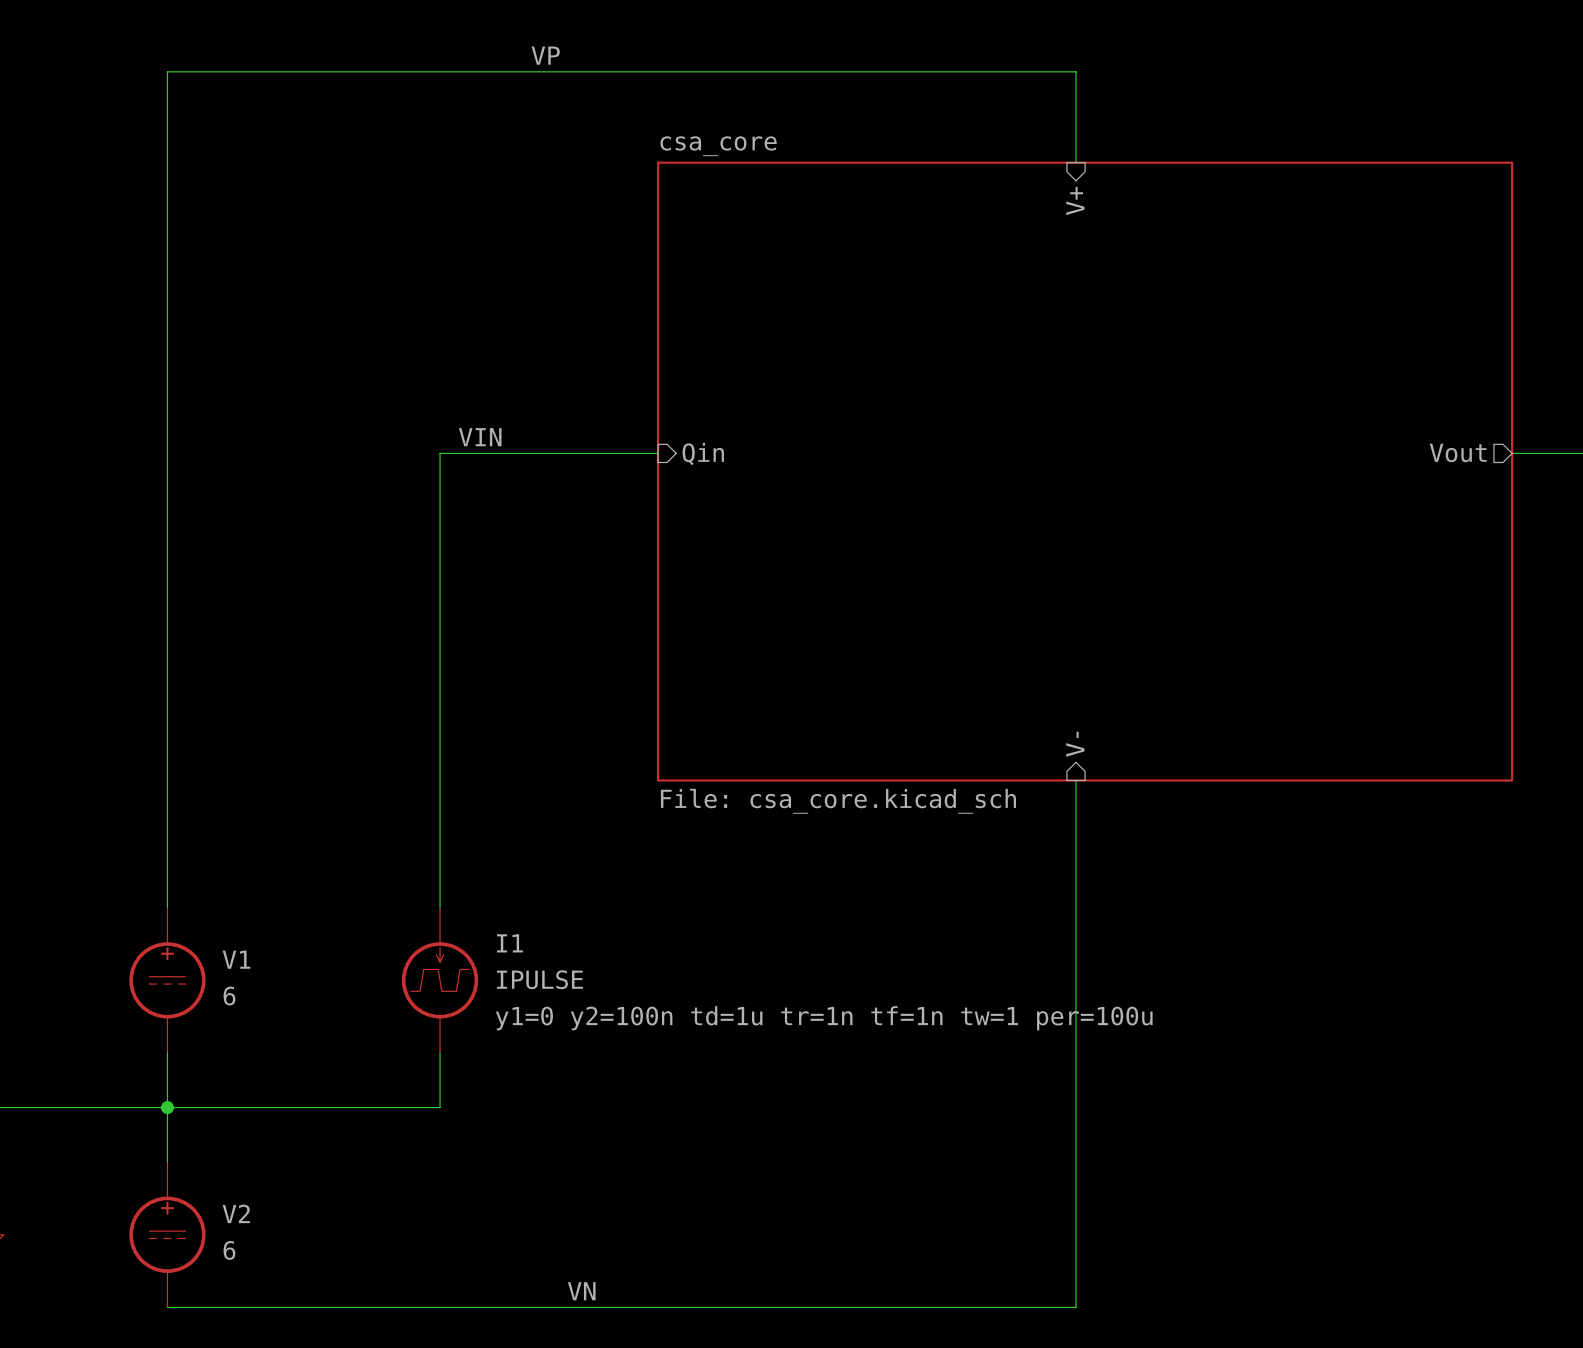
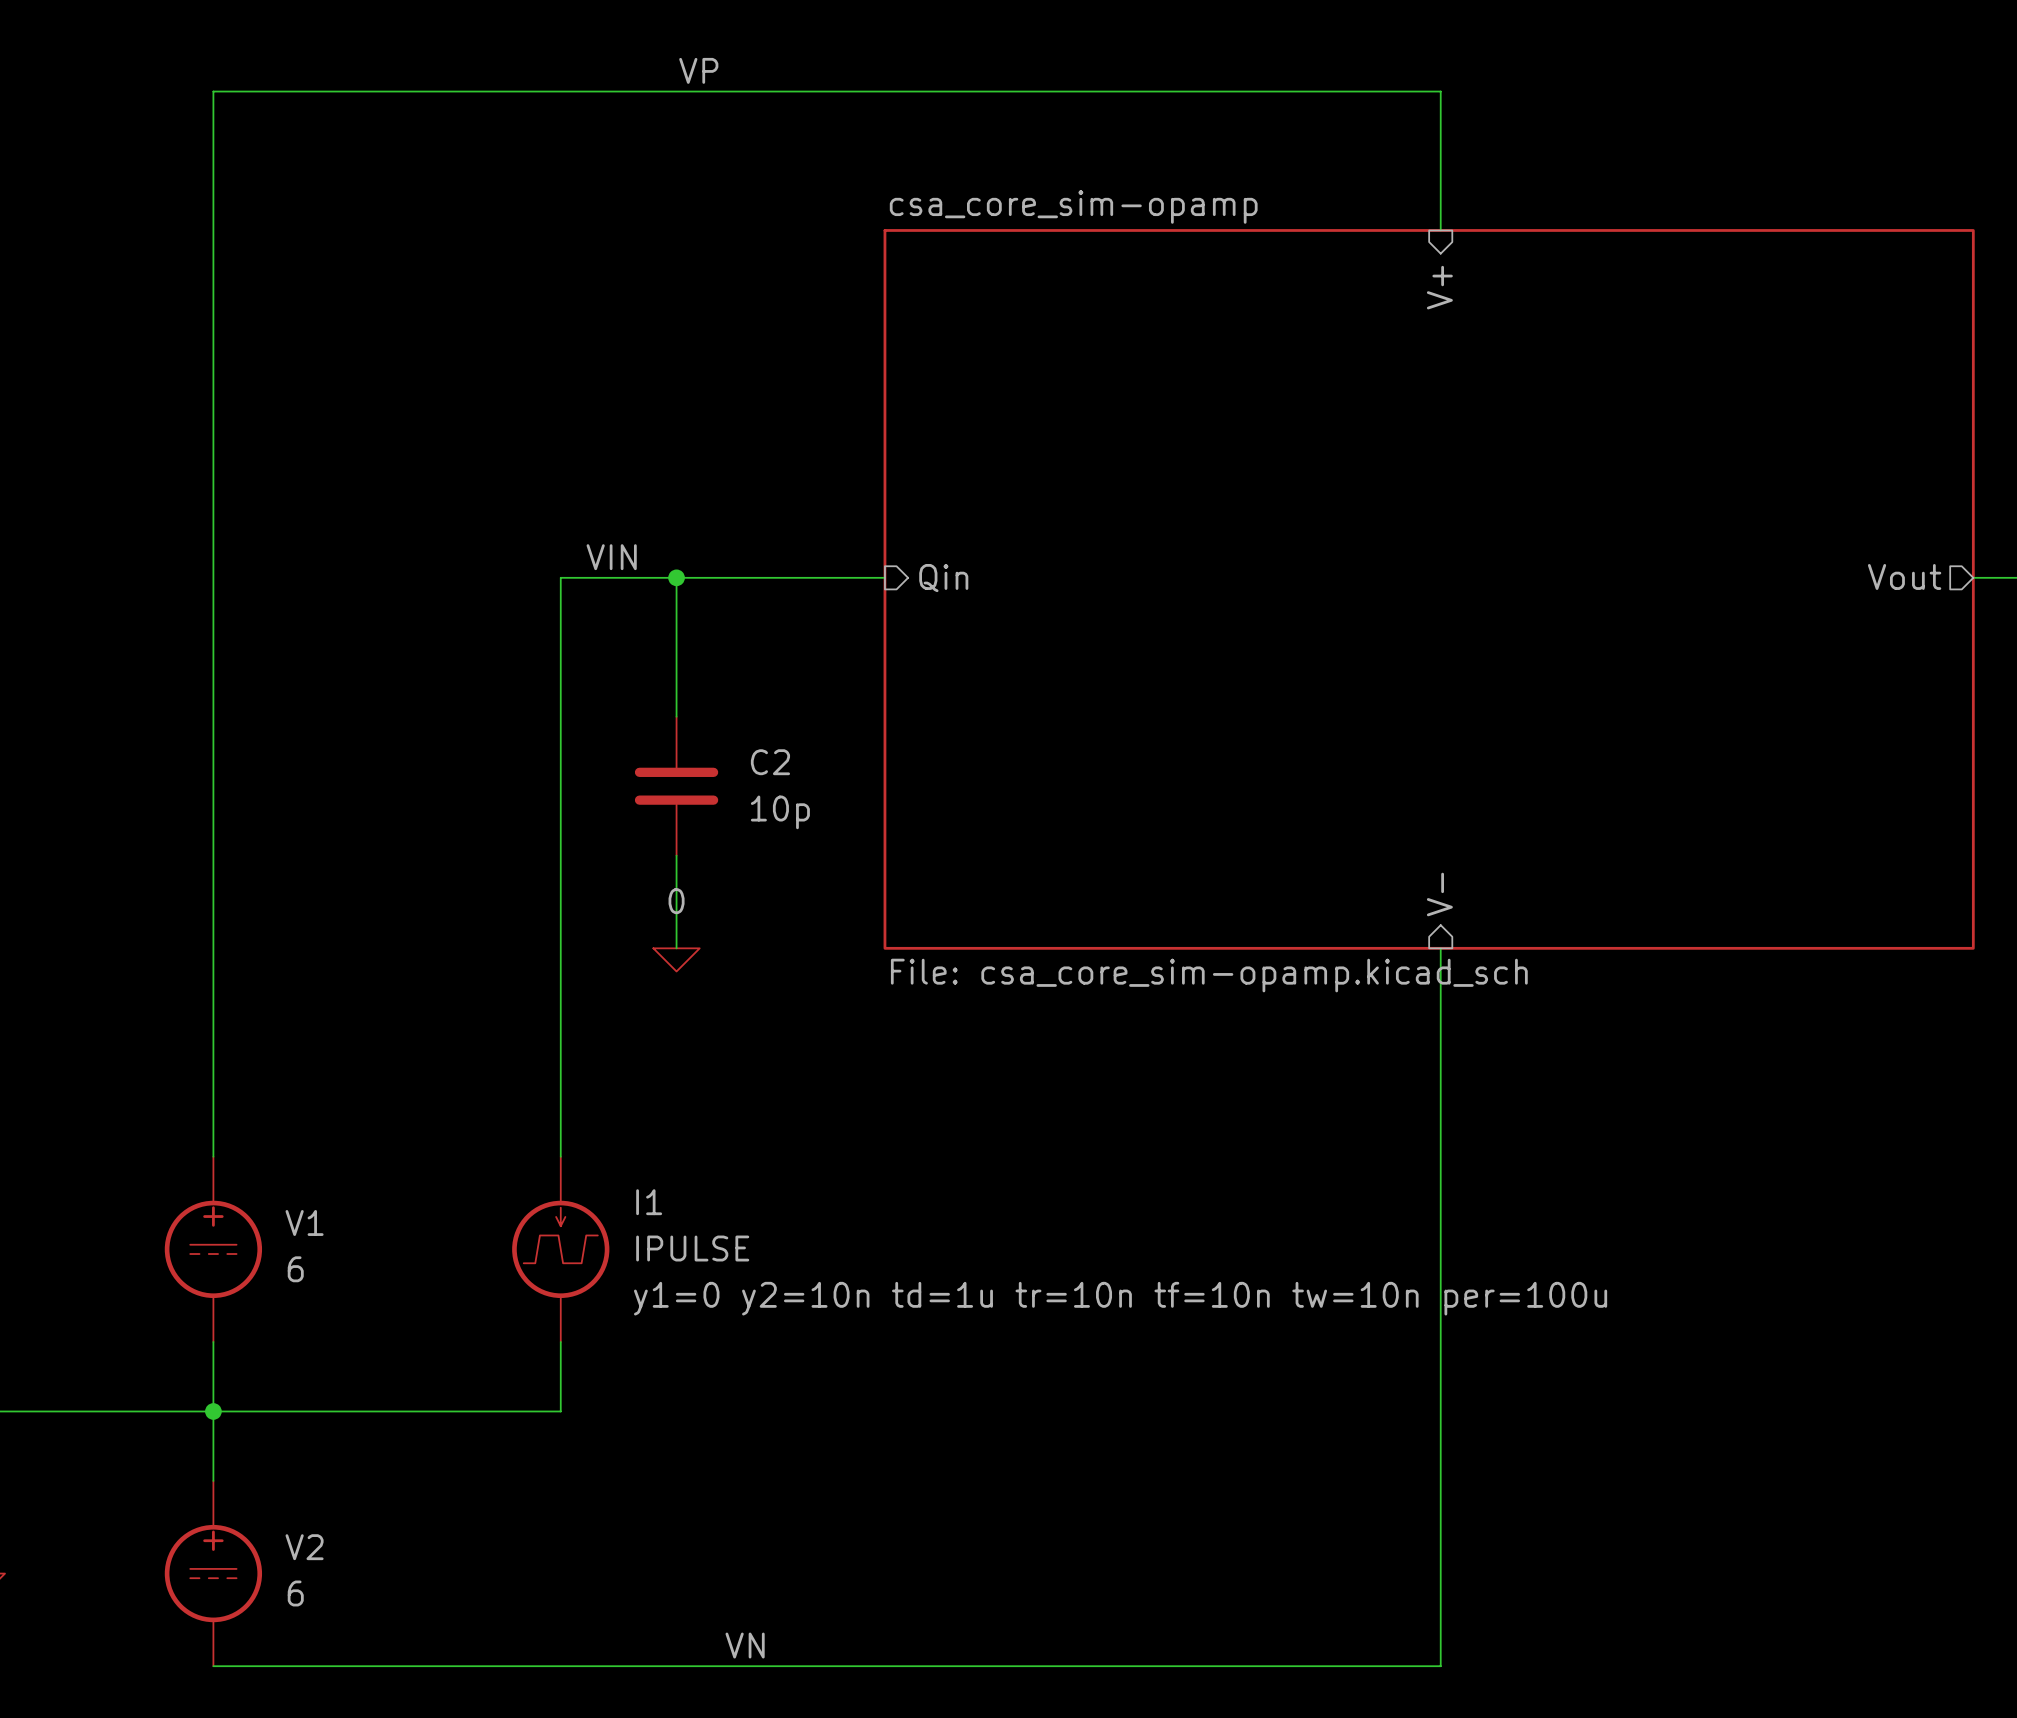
wire: (1076, 71) (1076, 162) -> (1371, 91) (1440, 91) (1440, 230)
sheet pin position: V+ (1075, 200) -> V+ (1439, 287)
sheet pin position: Vout (1458, 452) -> Vout (1904, 576)
wire: none -> (676, 577) (676, 716)
junction: none -> (676, 577)
wire: none -> (838, 577) (884, 577)
wire: (1512, 453) (1548, 453) -> none
sheet pin position: Qin (703, 454) -> Qin (943, 578)
sheet csa_core_sim-opamp: none -> File: csa_core_sim-opamp.kicad_sch (1429, 589)
sheet csa_core: File: csa_core.kicad_sch (1085, 471) -> none
C2: none -> 10p (676, 786)
wire: none -> (676, 855) (676, 948)
sheet pin position: V- (1075, 744) -> V- (1439, 894)
power symbol: none -> 0 (676, 959)
wire: (1076, 780) (1076, 1307) -> (1440, 948) (1440, 1666) (1371, 1666)
I1 text: y1=0 y2=100n td=1u tr=1n tf=1n tw=1 per=100u (824, 1018) -> y1=0 y2=10n td=1u tr=10n tf=10n tw=10n per=100u (1120, 1298)

